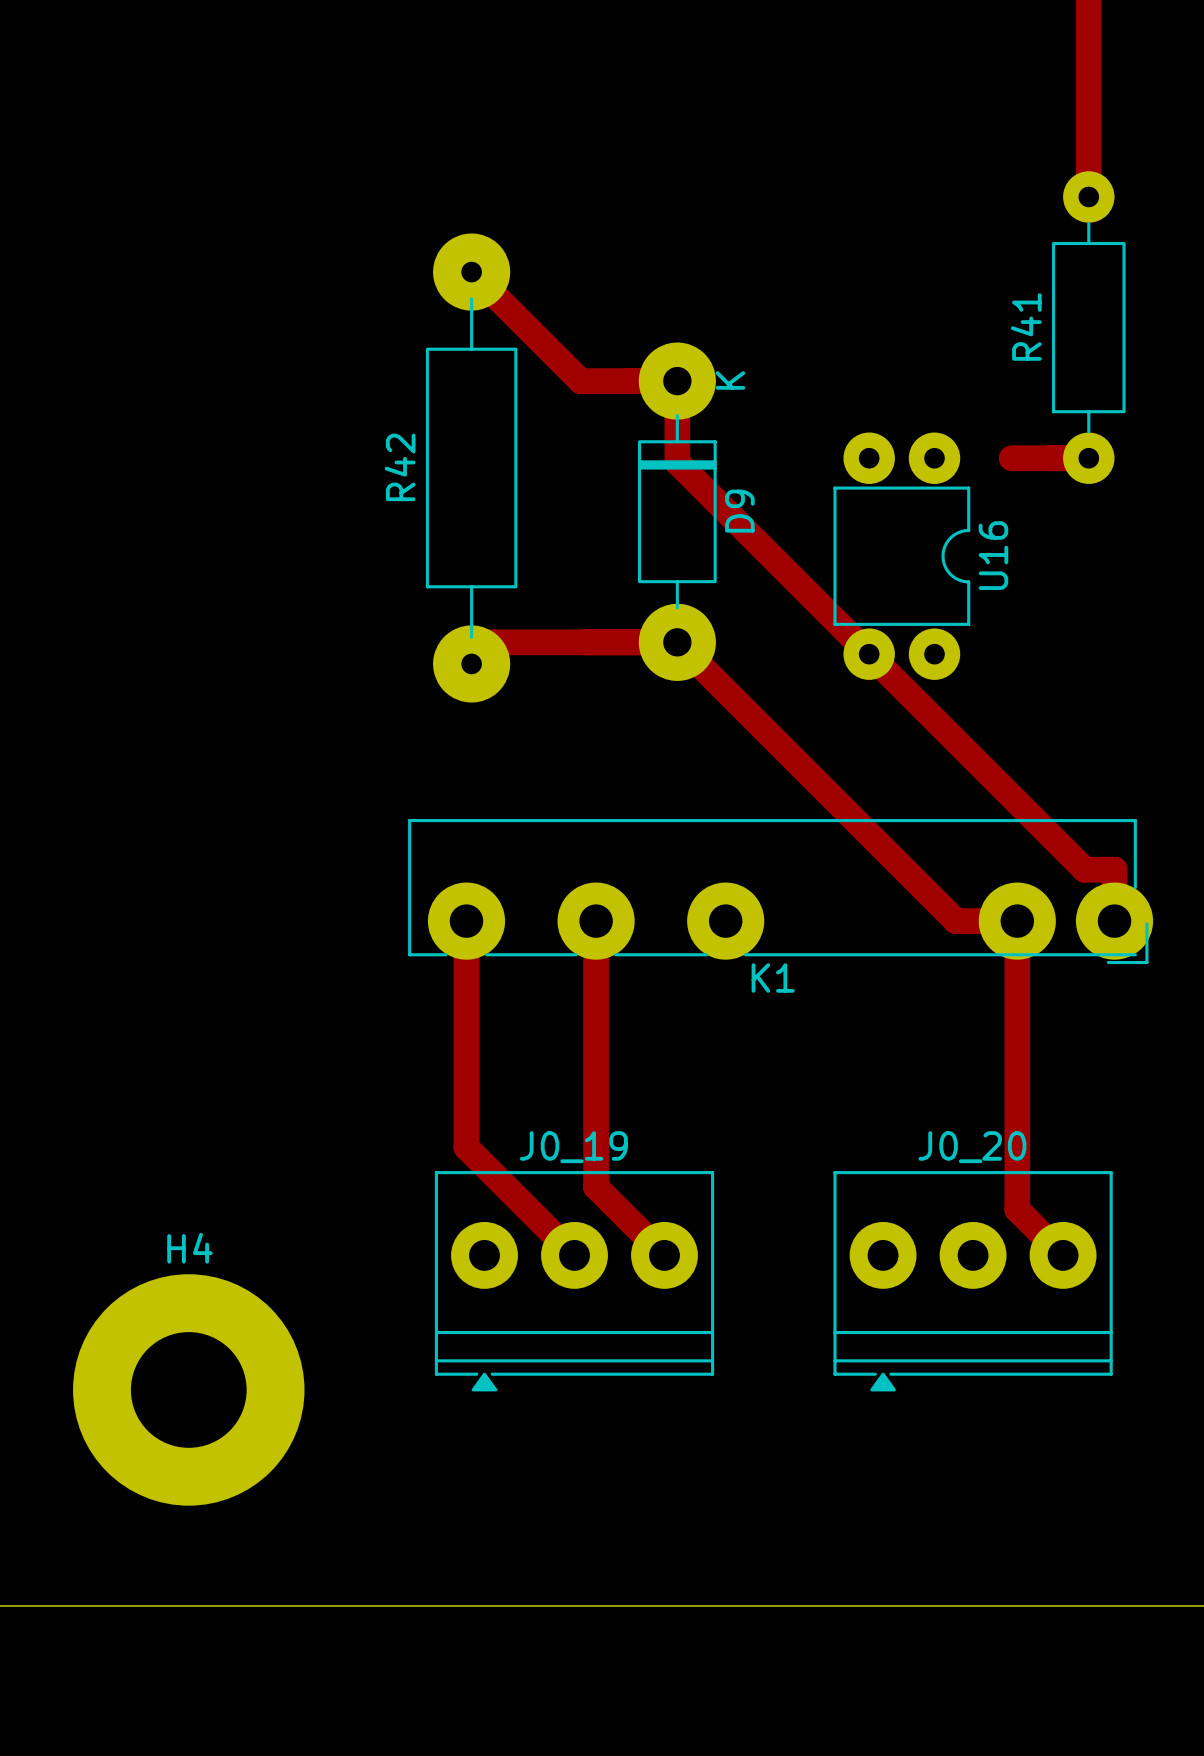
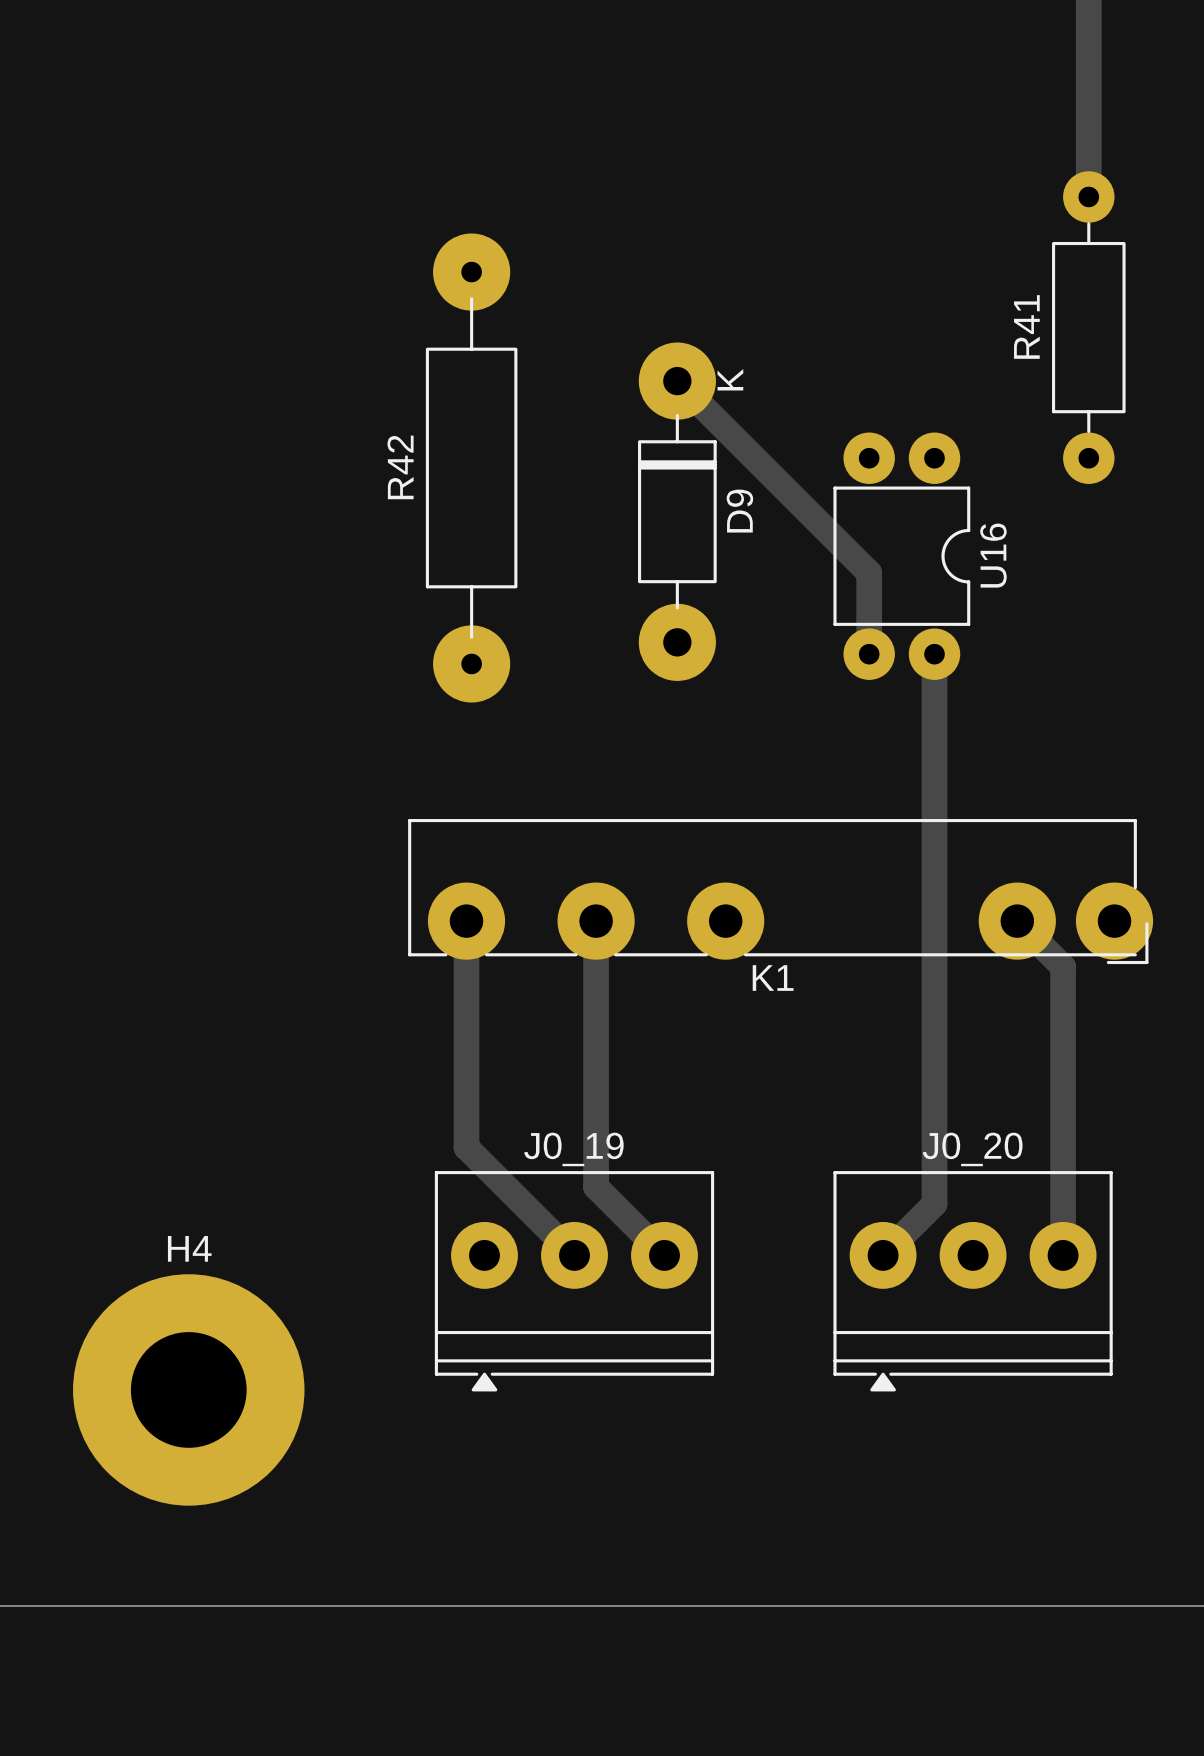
track: (471, 272) (580, 381) (677, 381) (677, 462) (1084, 869) (1114, 869) (1114, 921) -> none
track: none -> (677, 381) (869, 572) (869, 654)
track: (1011, 458) (1088, 458) -> none
track: none -> (934, 654) (934, 1203) (883, 1255)
track: (471, 663) (493, 642) (677, 642) (956, 921) (1017, 921) (1017, 1209) (1063, 1255) (1045, 1238) -> none
track: none -> (1017, 921) (1063, 966) (1063, 1255)

